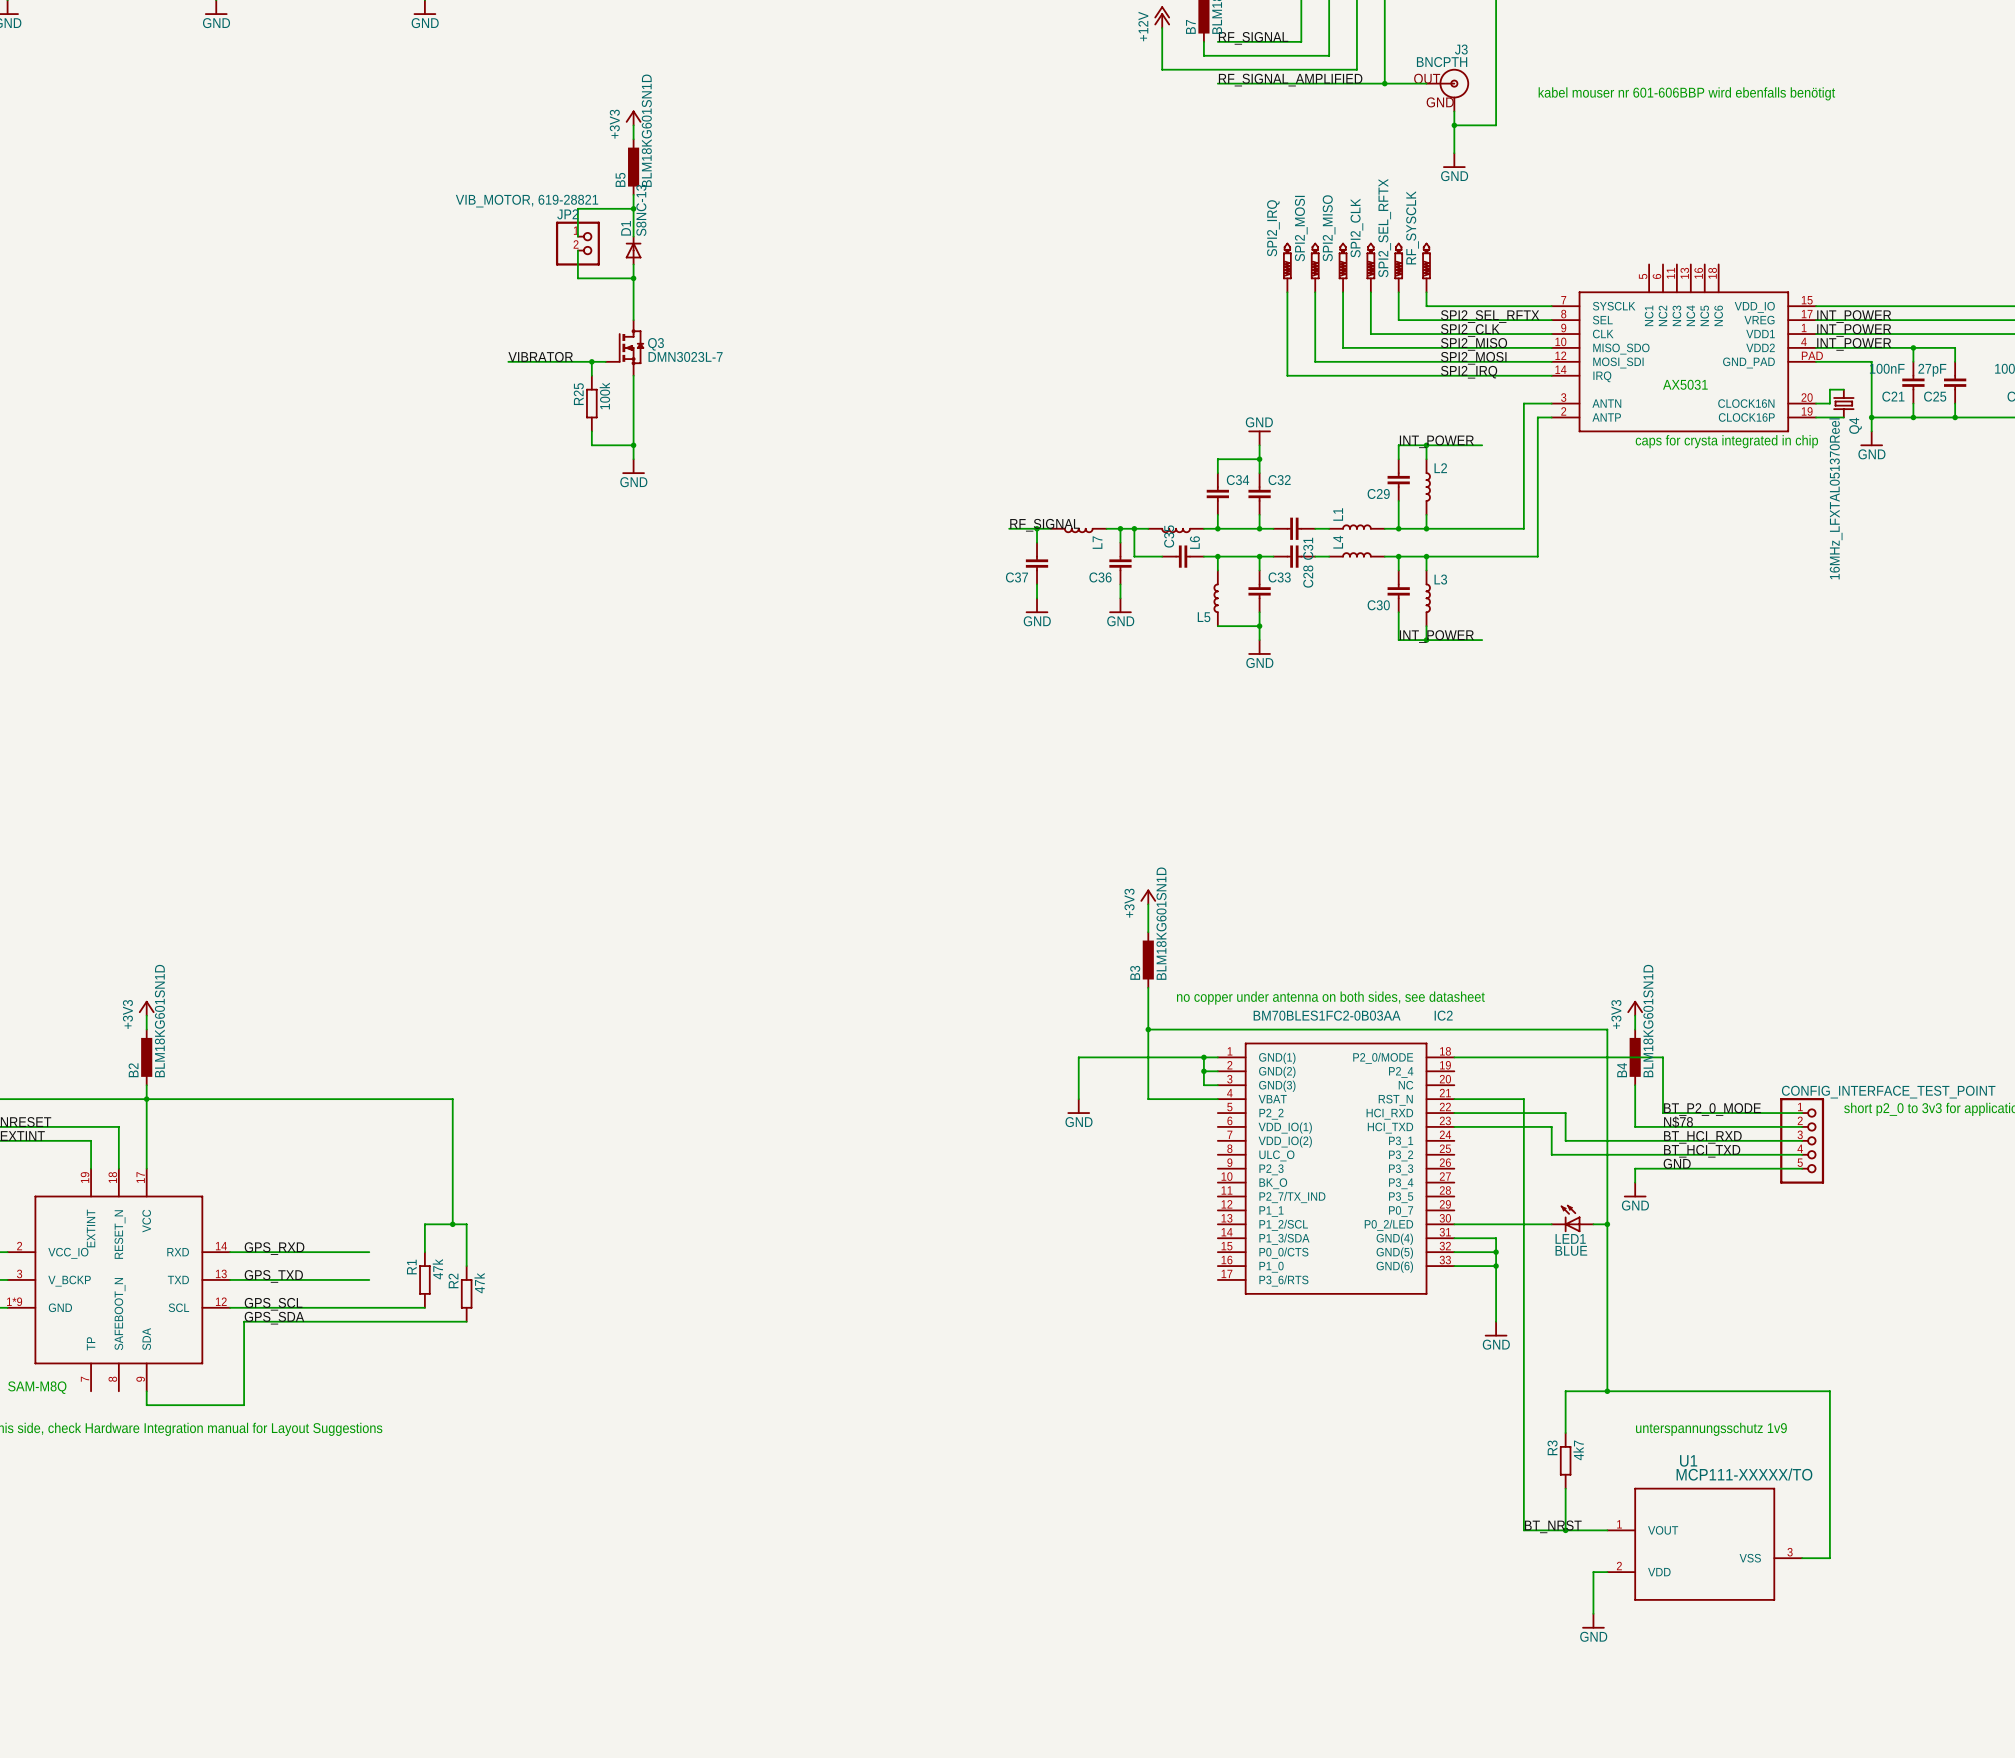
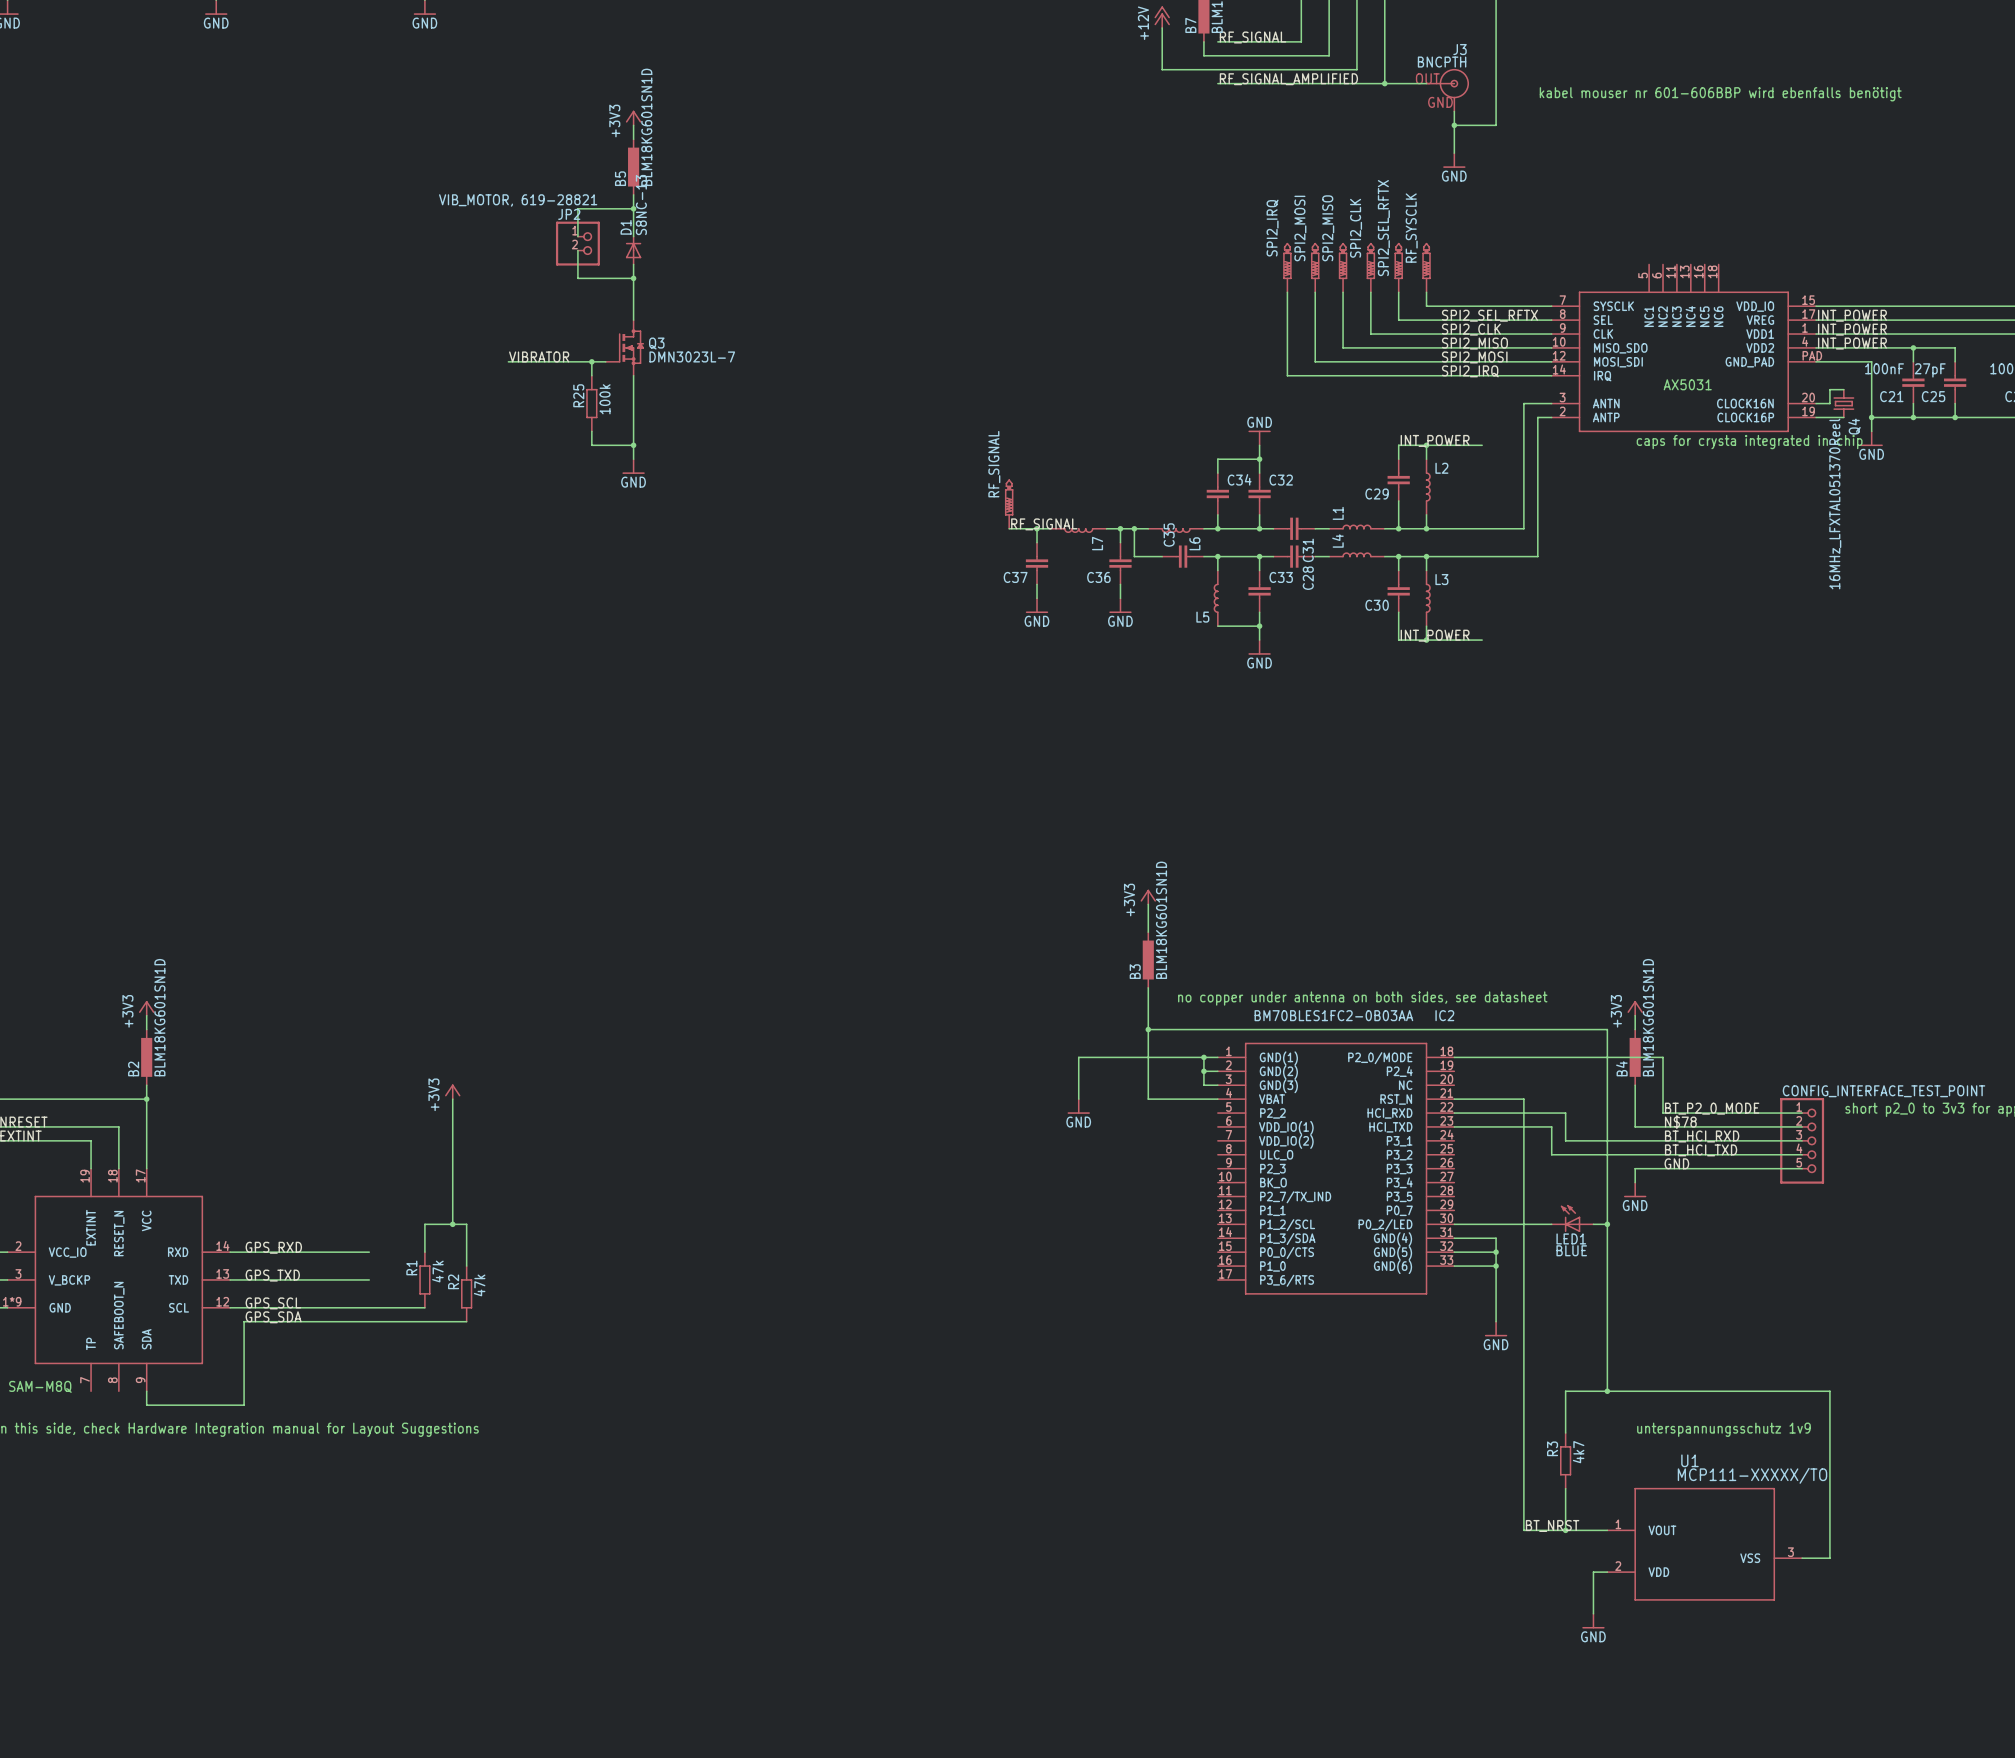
RF_SIGNAL: none -> (1009, 504)
power symbol: none -> +3V3 (452, 1091)
wire: (146, 1099) (452, 1099) -> none

